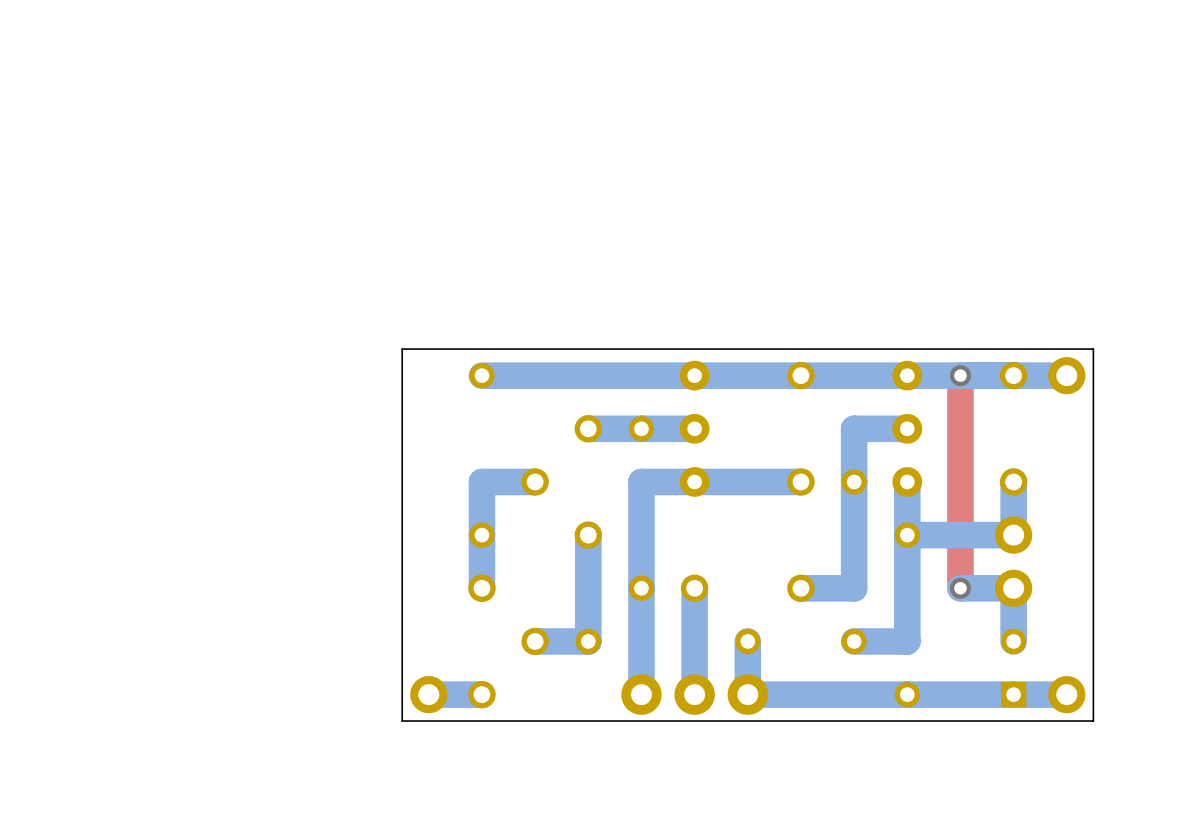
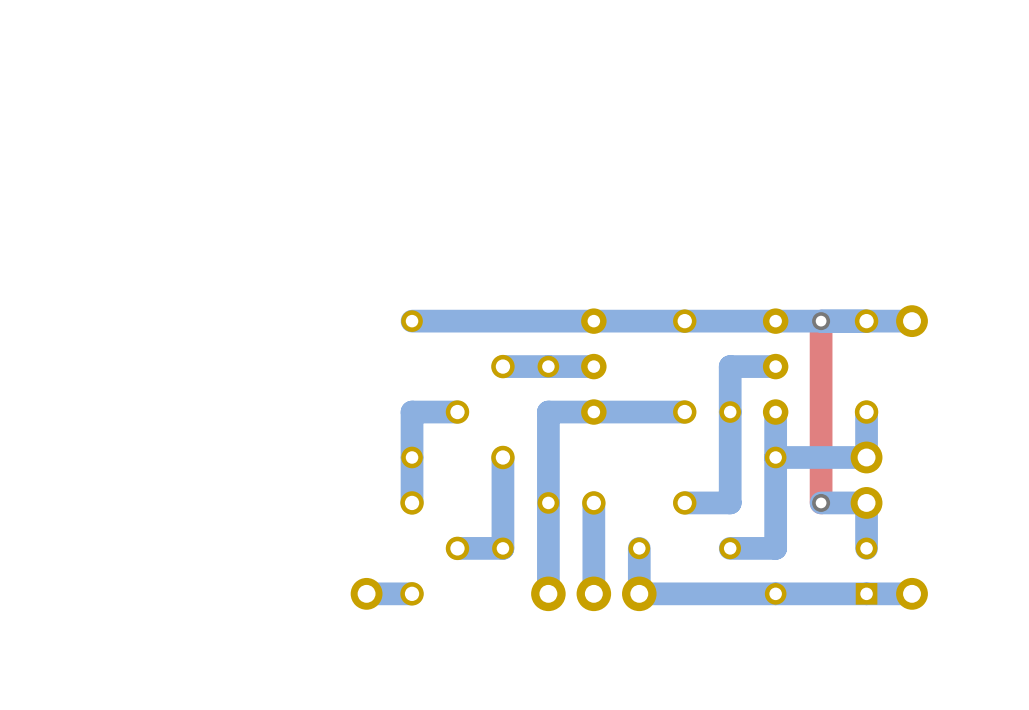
board edge: (1093, 349) (402, 349) (402, 721) (1093, 721) (1093, 349) -> none

